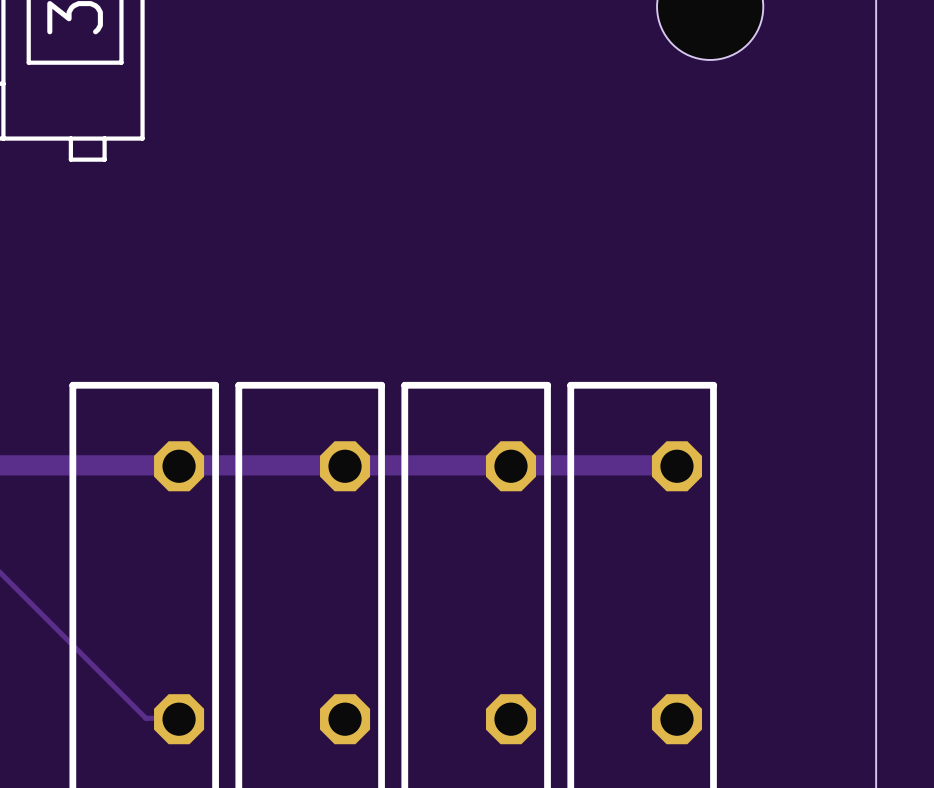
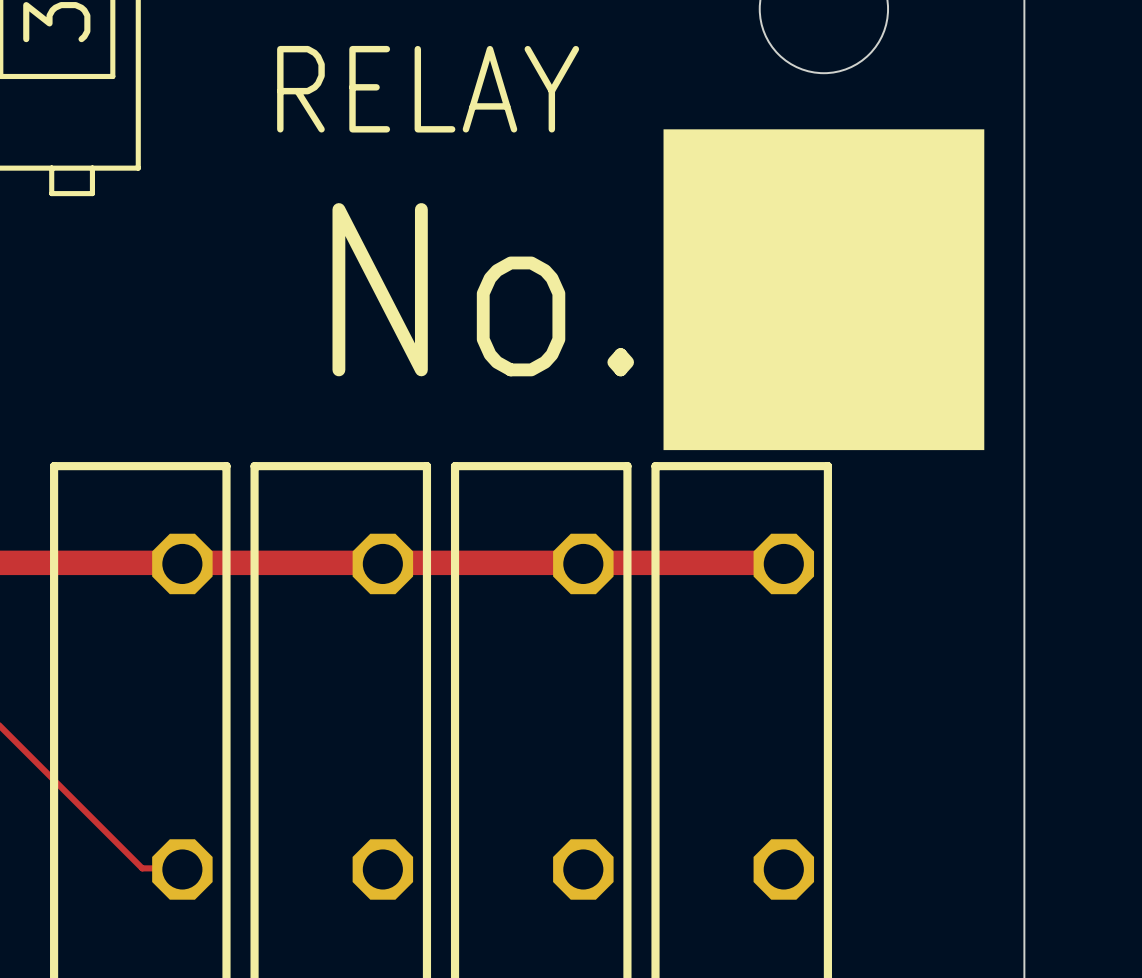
text: none -> RELAY (428, 89)
drawing: none -> [663, 129, 985, 451]
text: none -> No. (483, 289)

